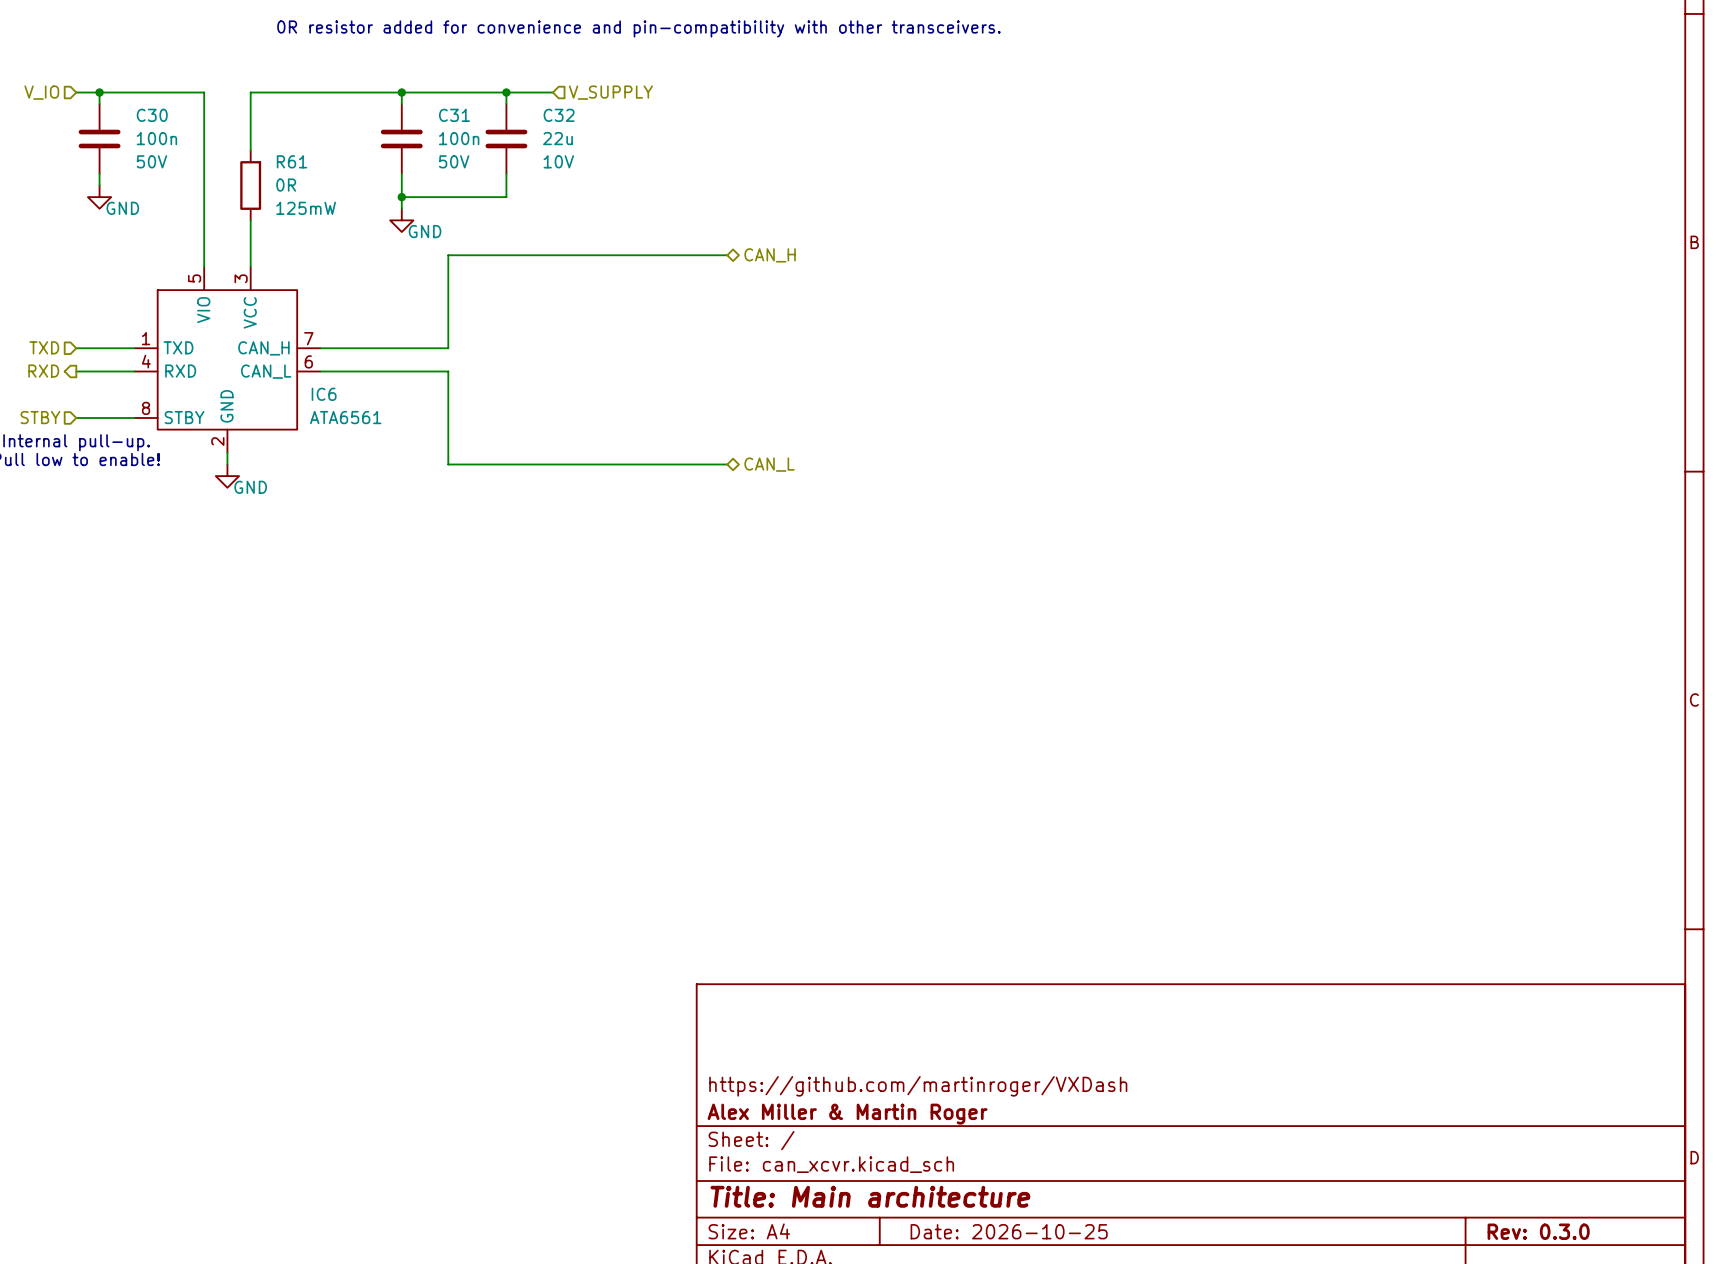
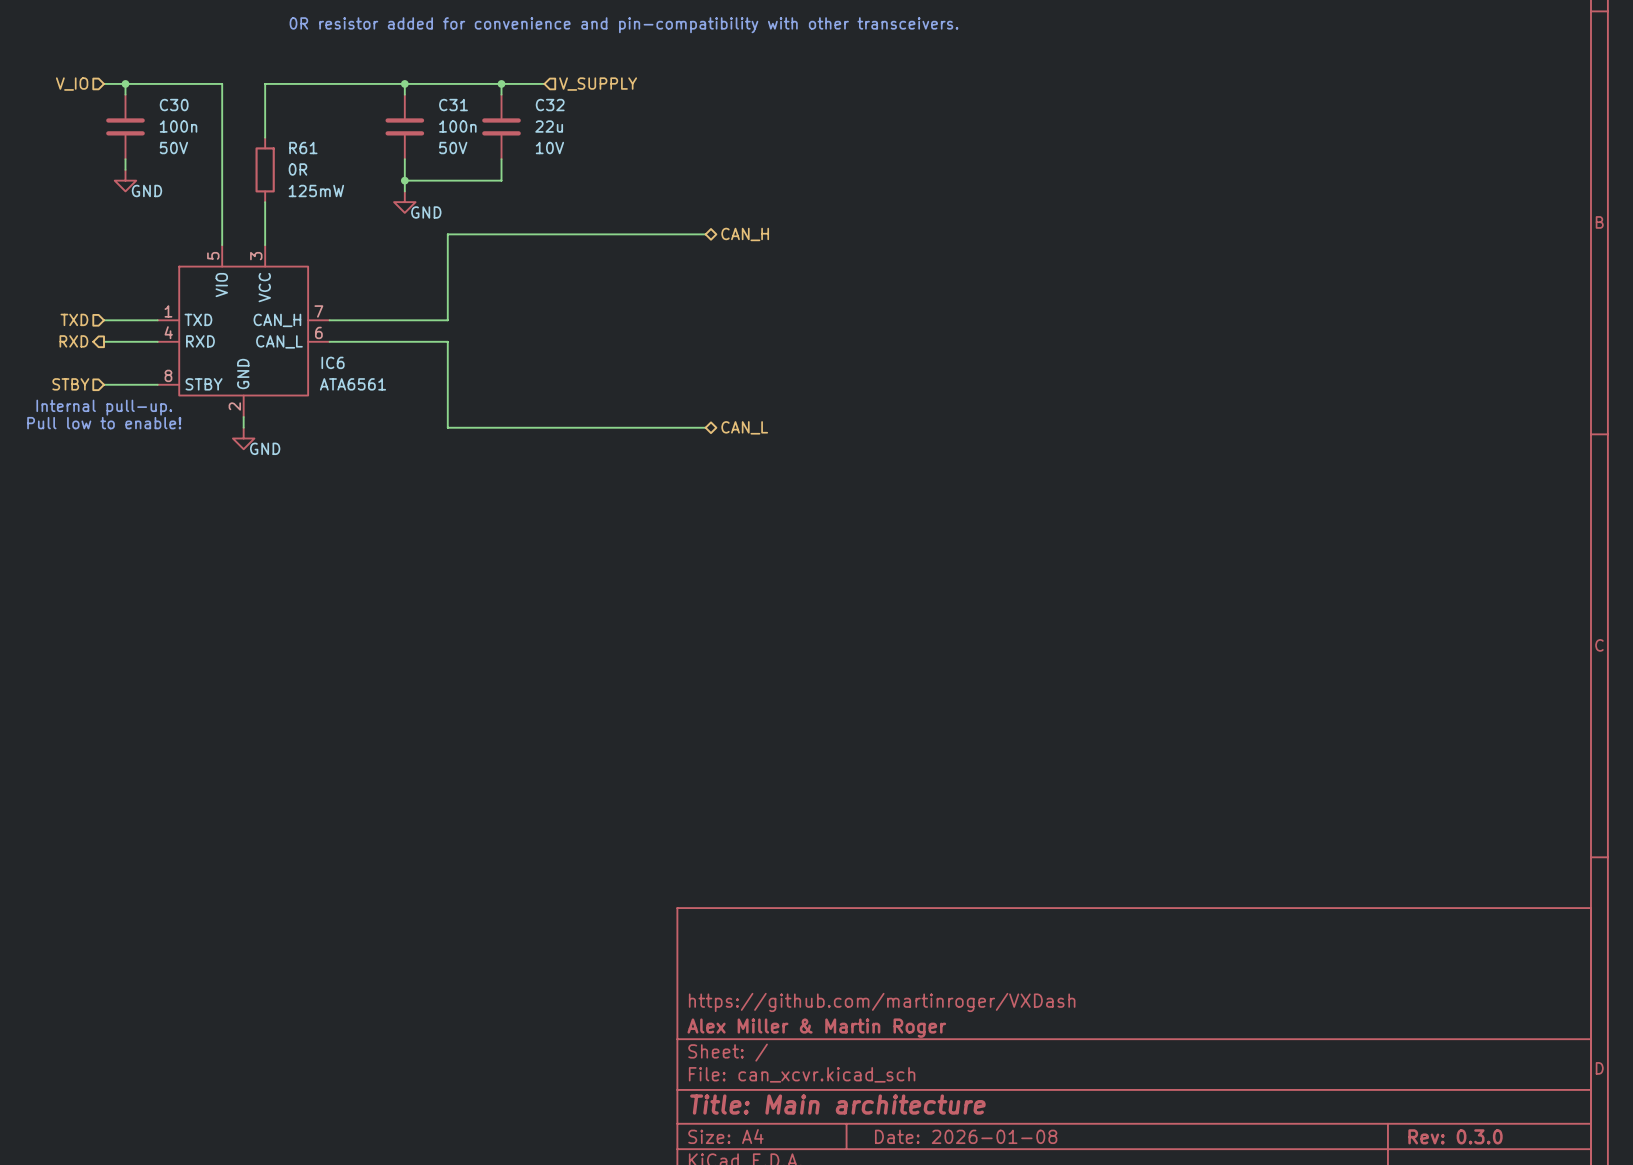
title block: Date: 2026-10-25 (1009, 1231) -> Date: 2026-01-08 (966, 1136)

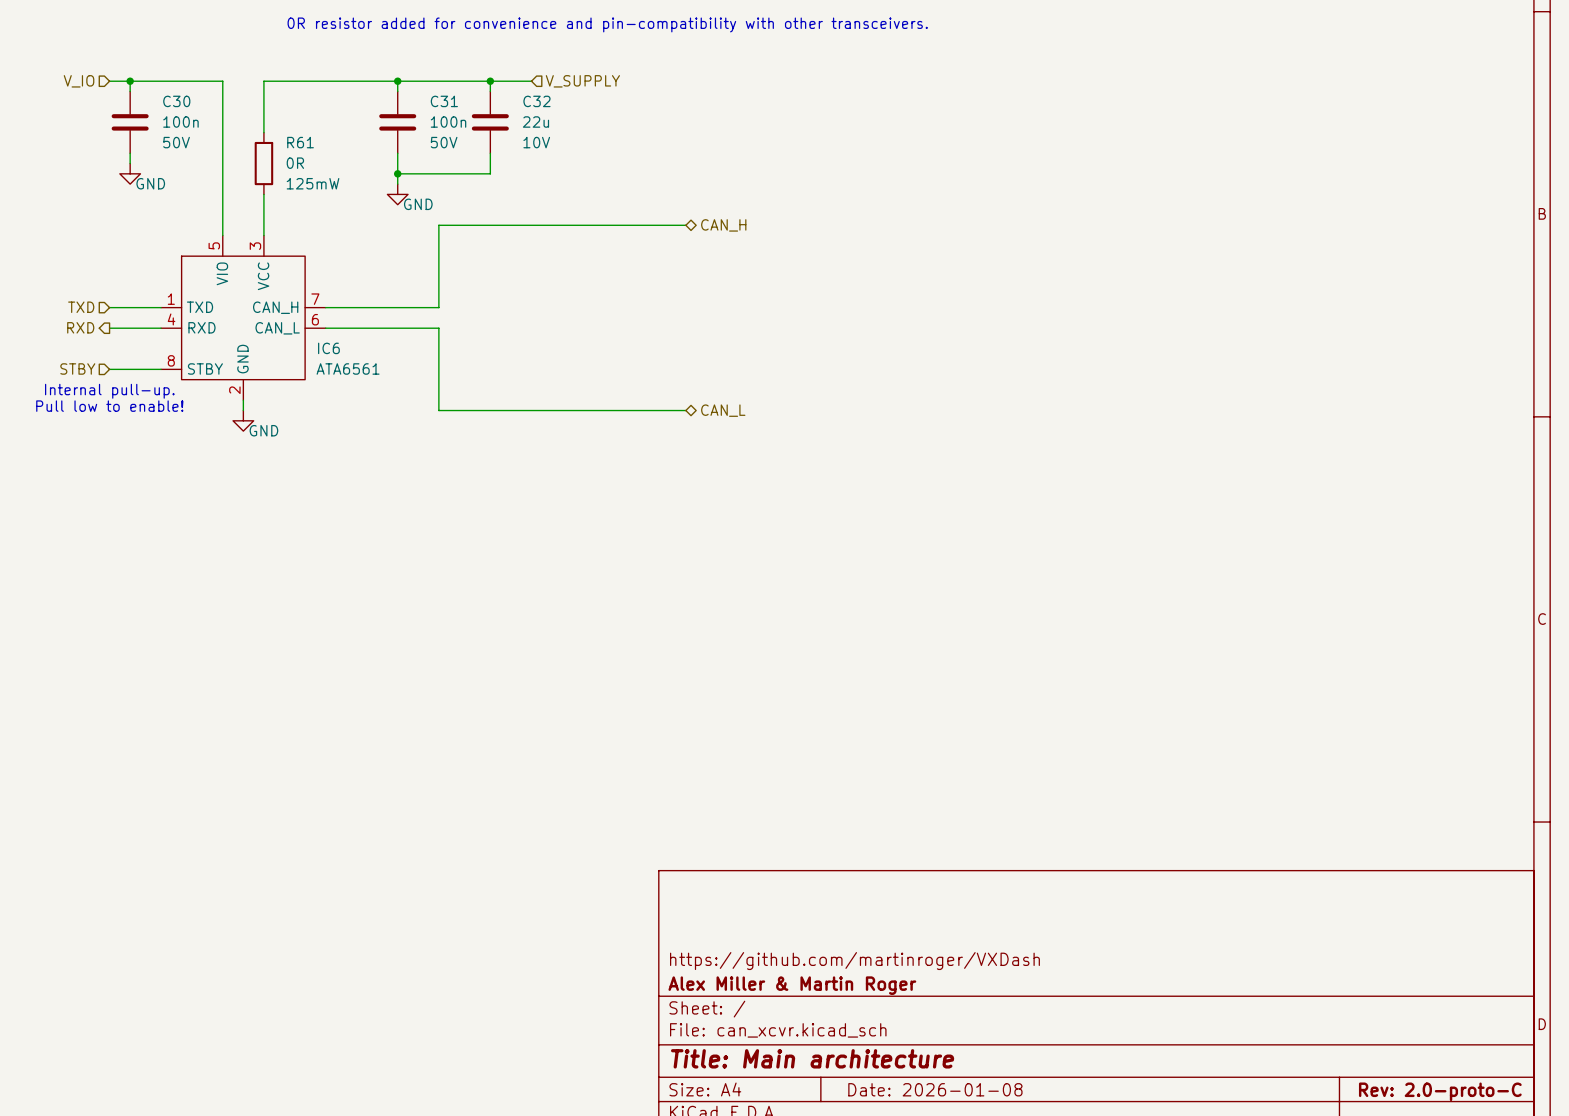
title block: Rev: 0.3.0 (1455, 1136) -> Rev: 2.0-proto-C (1440, 1091)

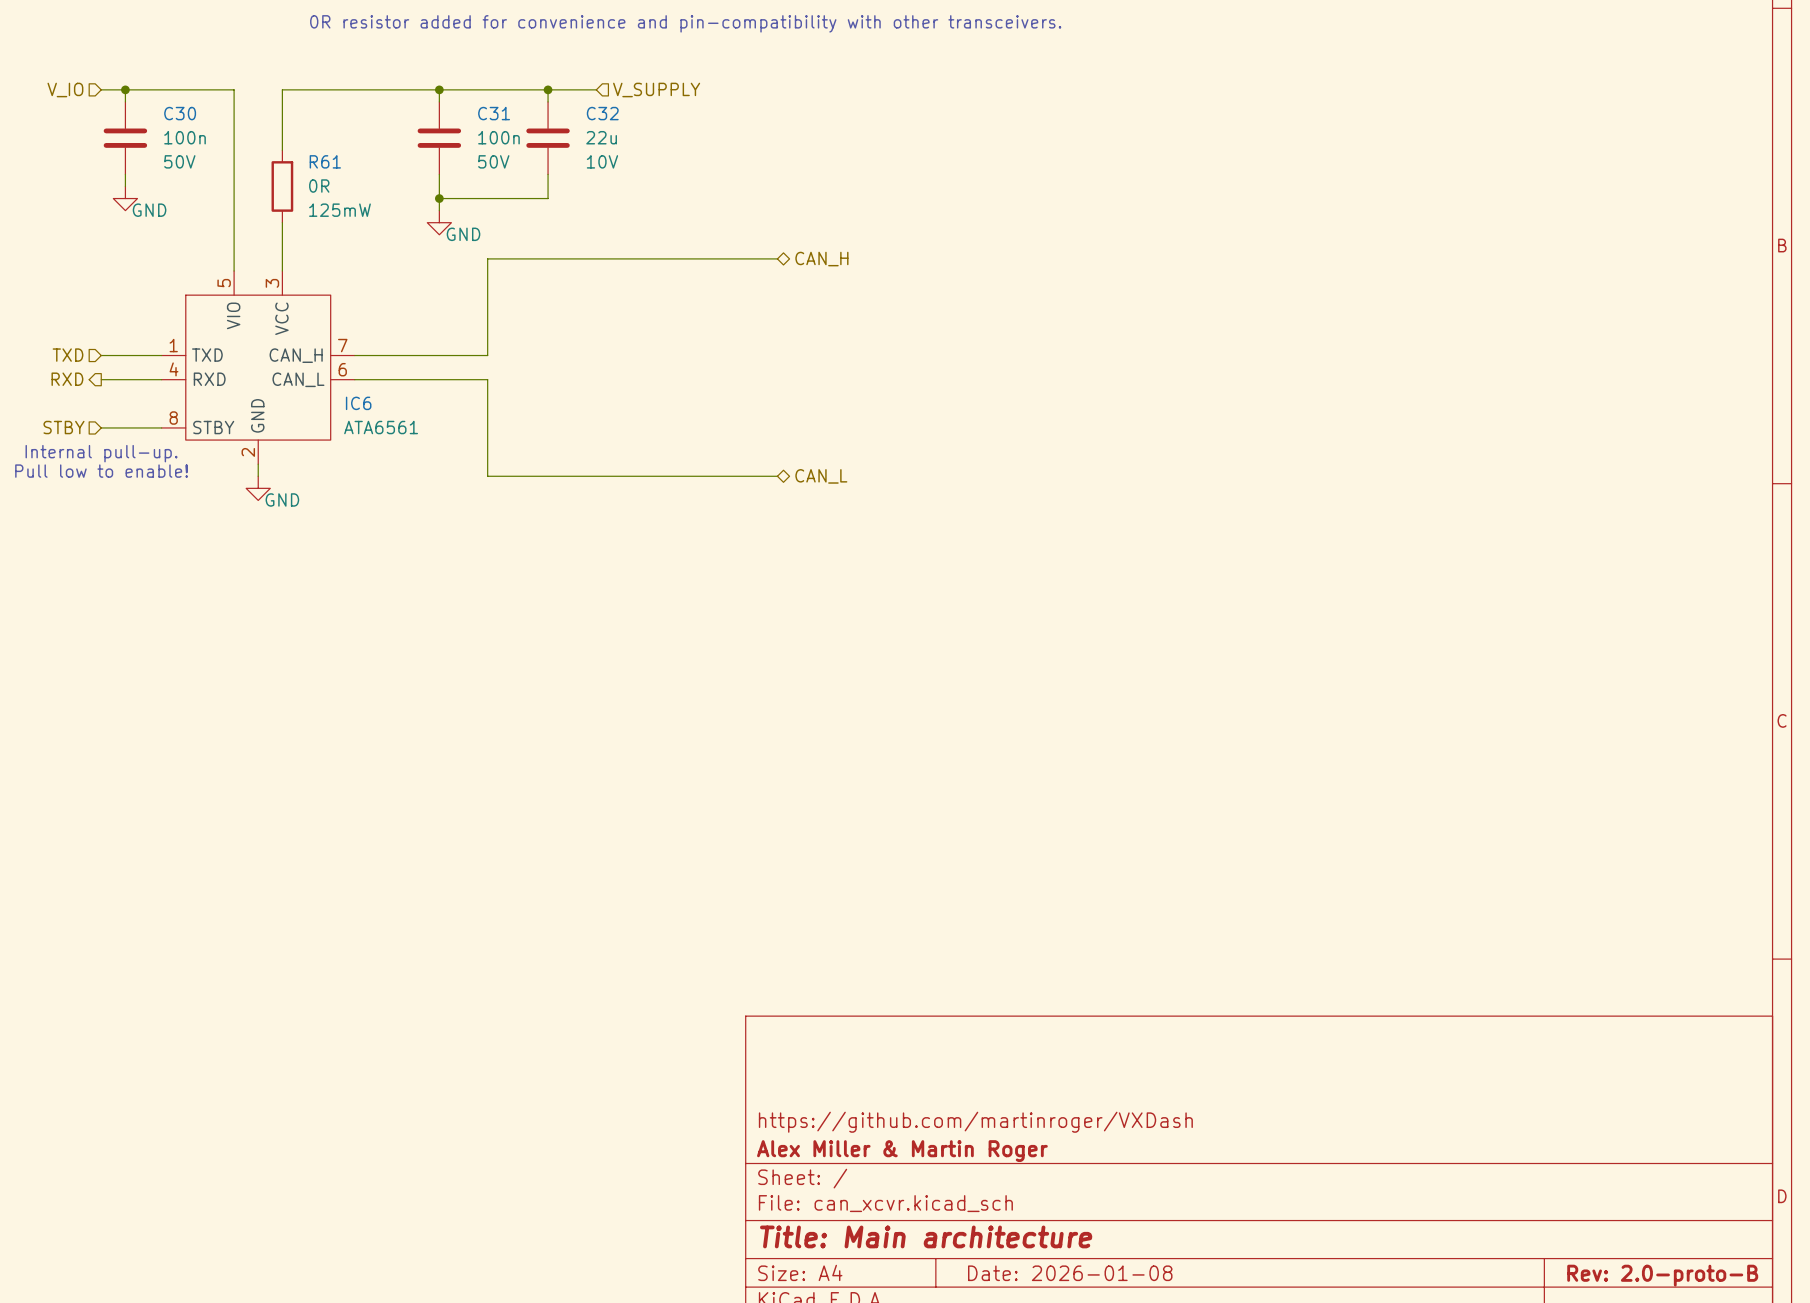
title block: Rev: 2.0-proto-C (1440, 1091) -> Rev: 2.0-proto-B (1662, 1275)

